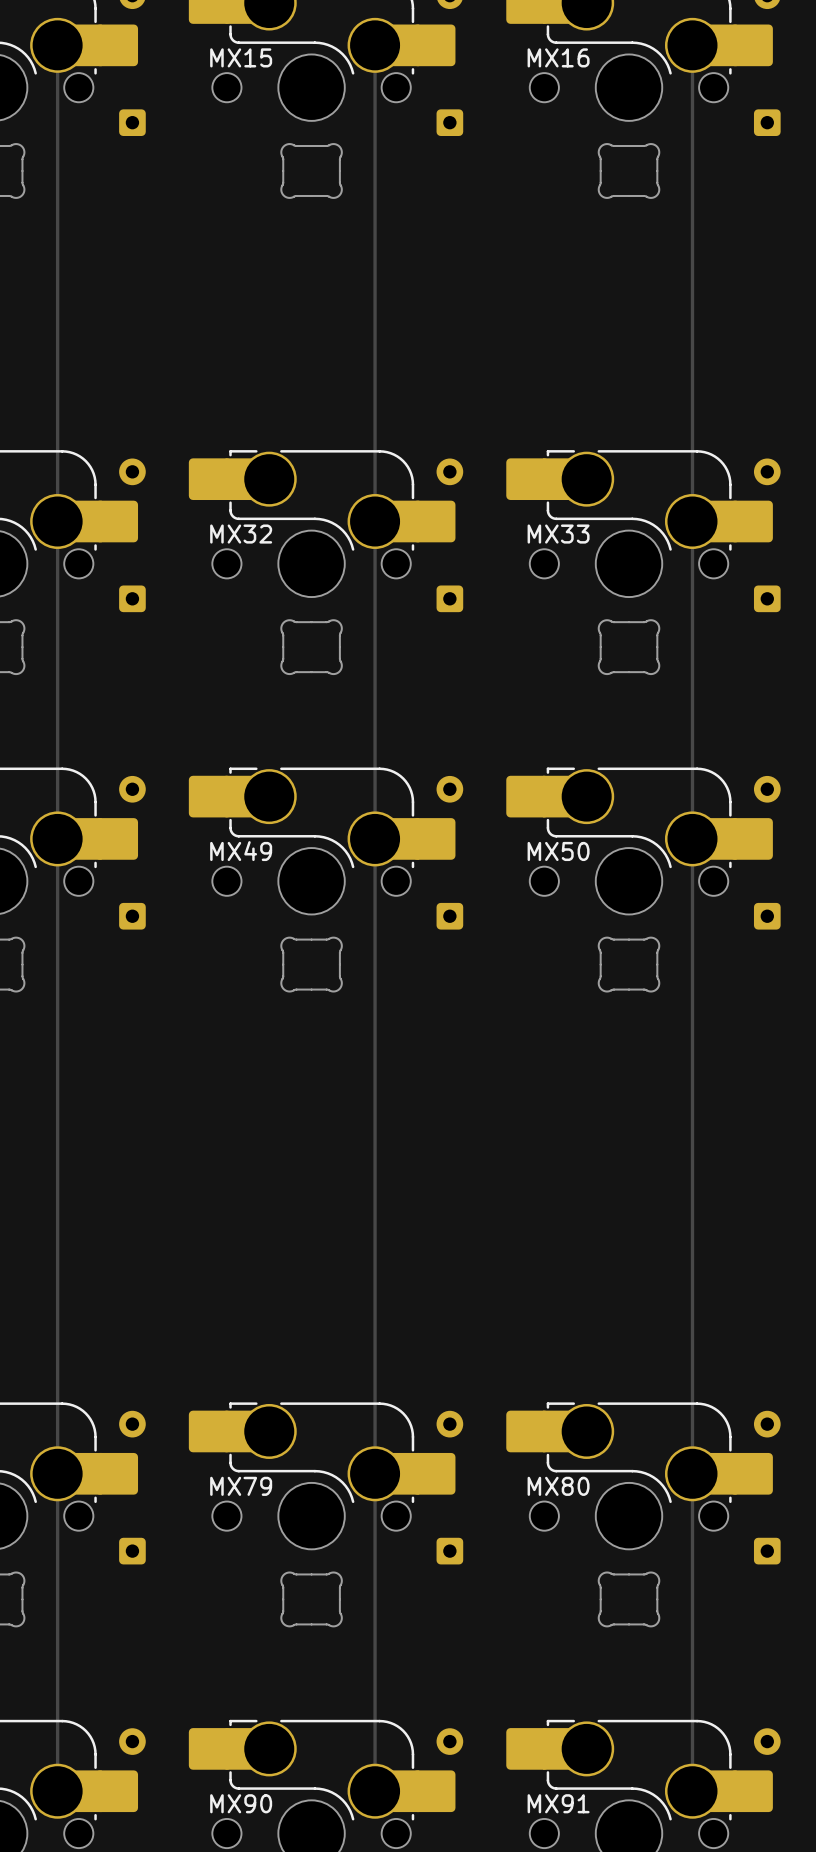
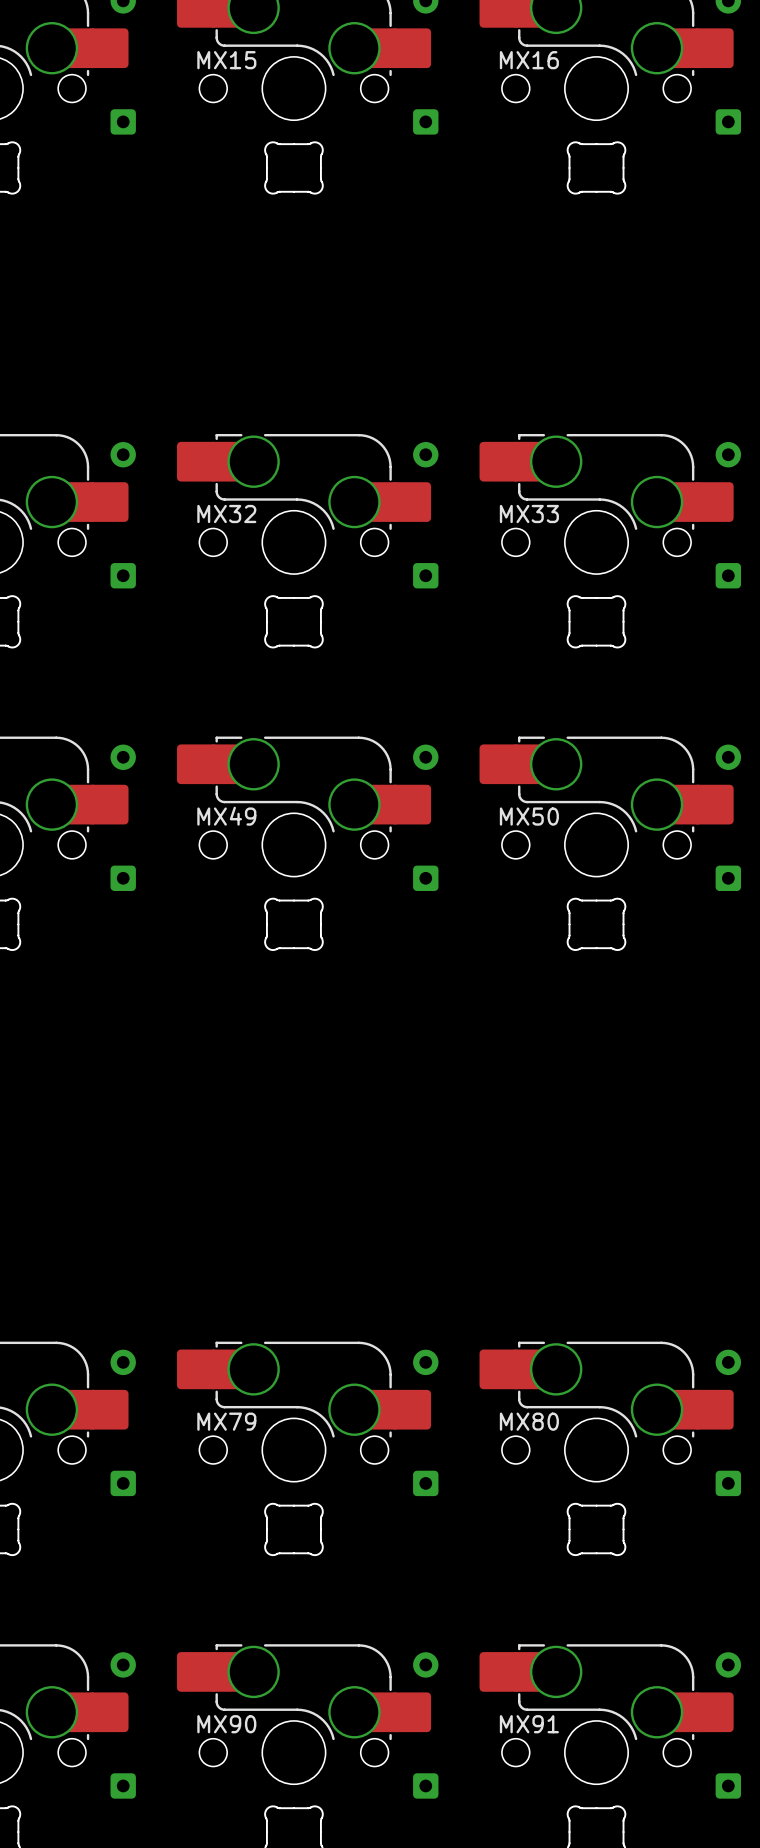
track: (57, 45) (57, 1791) -> none
track: (375, 45) (375, 1791) -> none
track: (692, 45) (692, 1791) -> none

